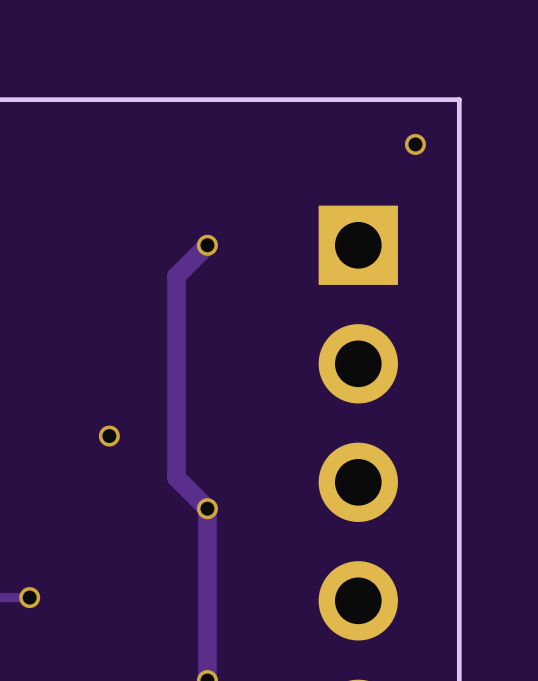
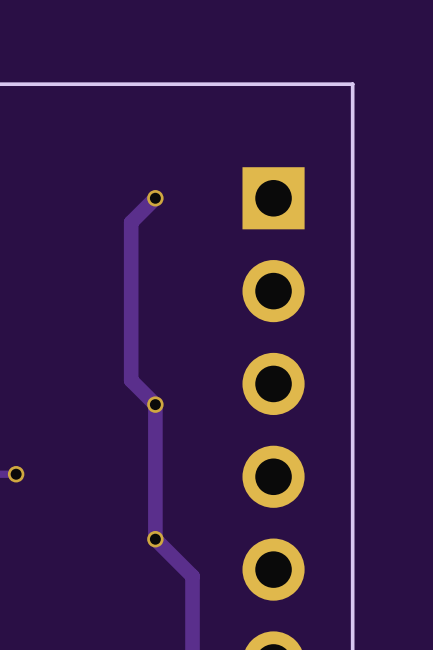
via: (415, 144) -> none
via: (109, 436) -> none

